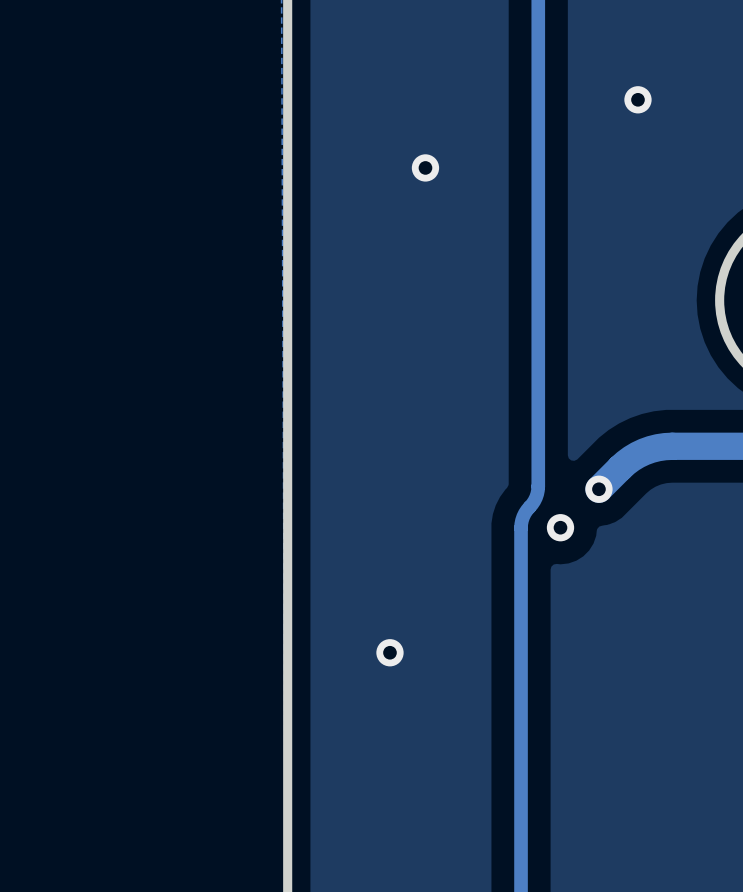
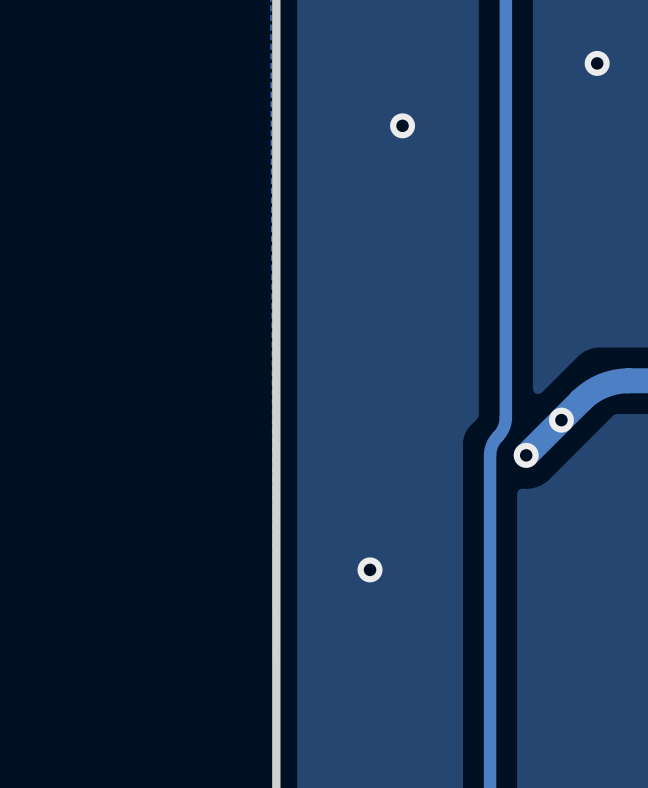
track: none -> (561, 420) (526, 455)

